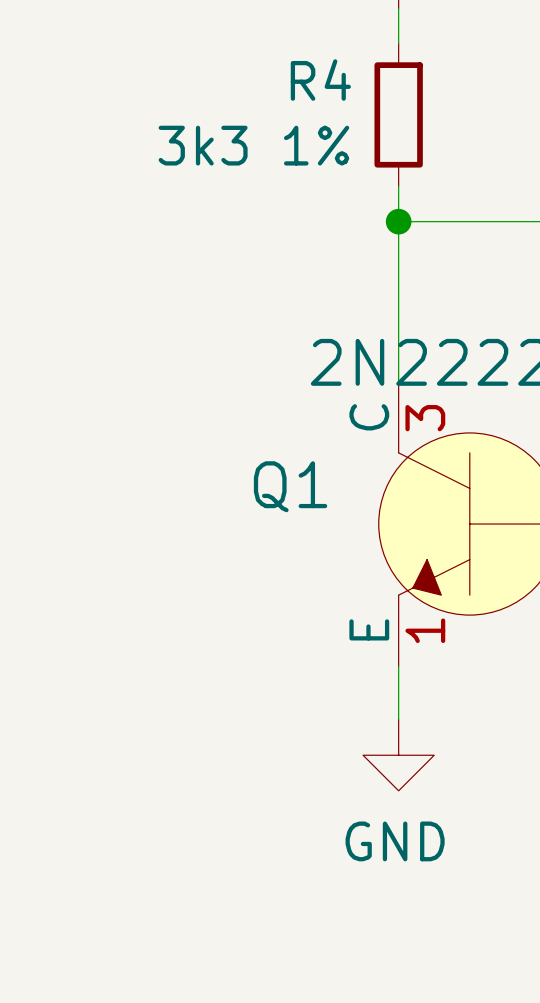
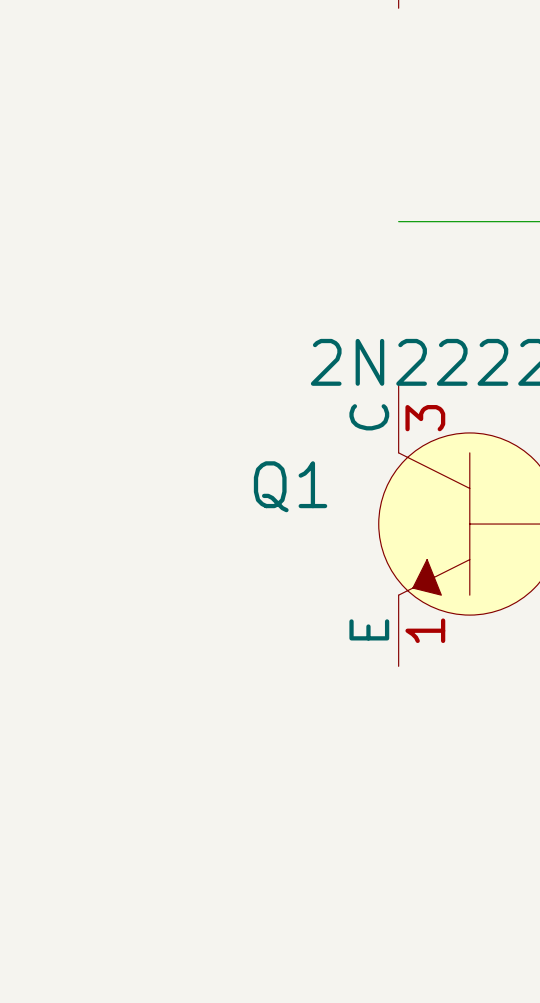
wire: (398, 8) (398, 43) -> none
R4: 3k3 1% (398, 114) -> none
wire: (398, 186) (398, 381) -> none
junction: (398, 221) -> none
wire: (398, 666) (398, 719) -> none
power symbol: GND (398, 755) -> none

